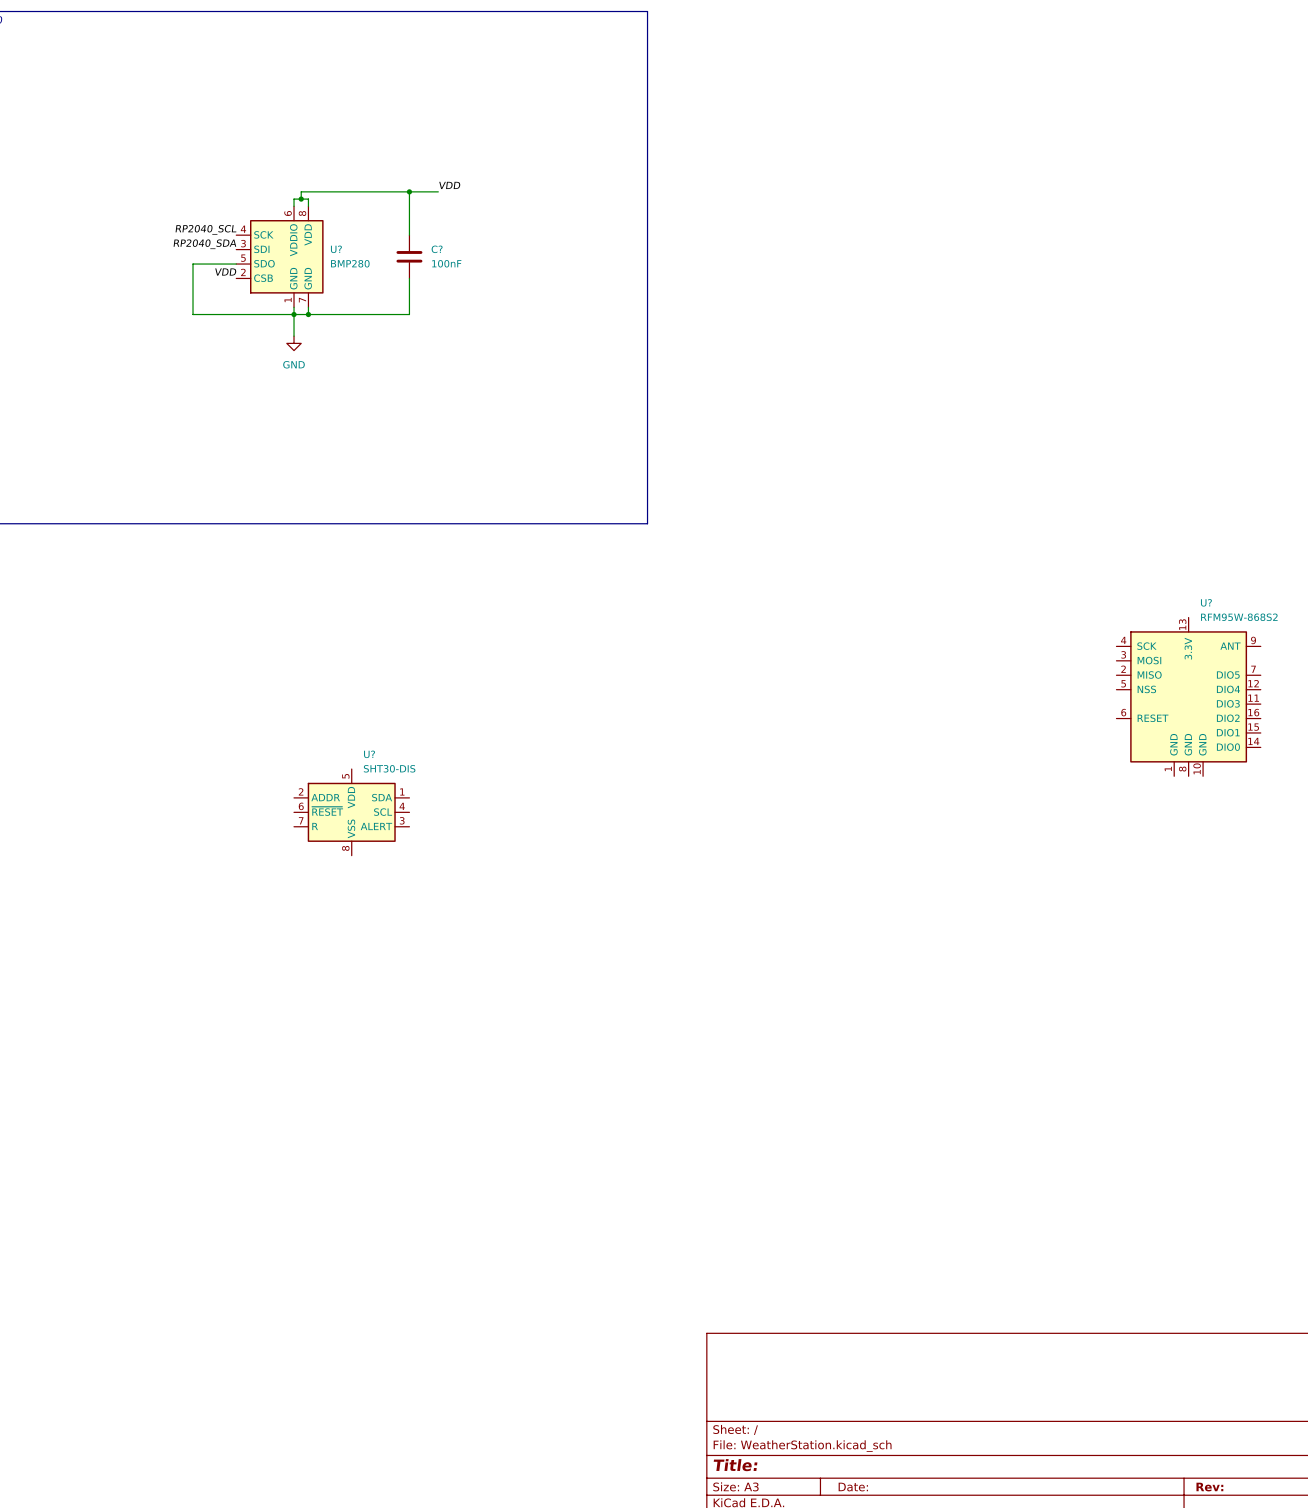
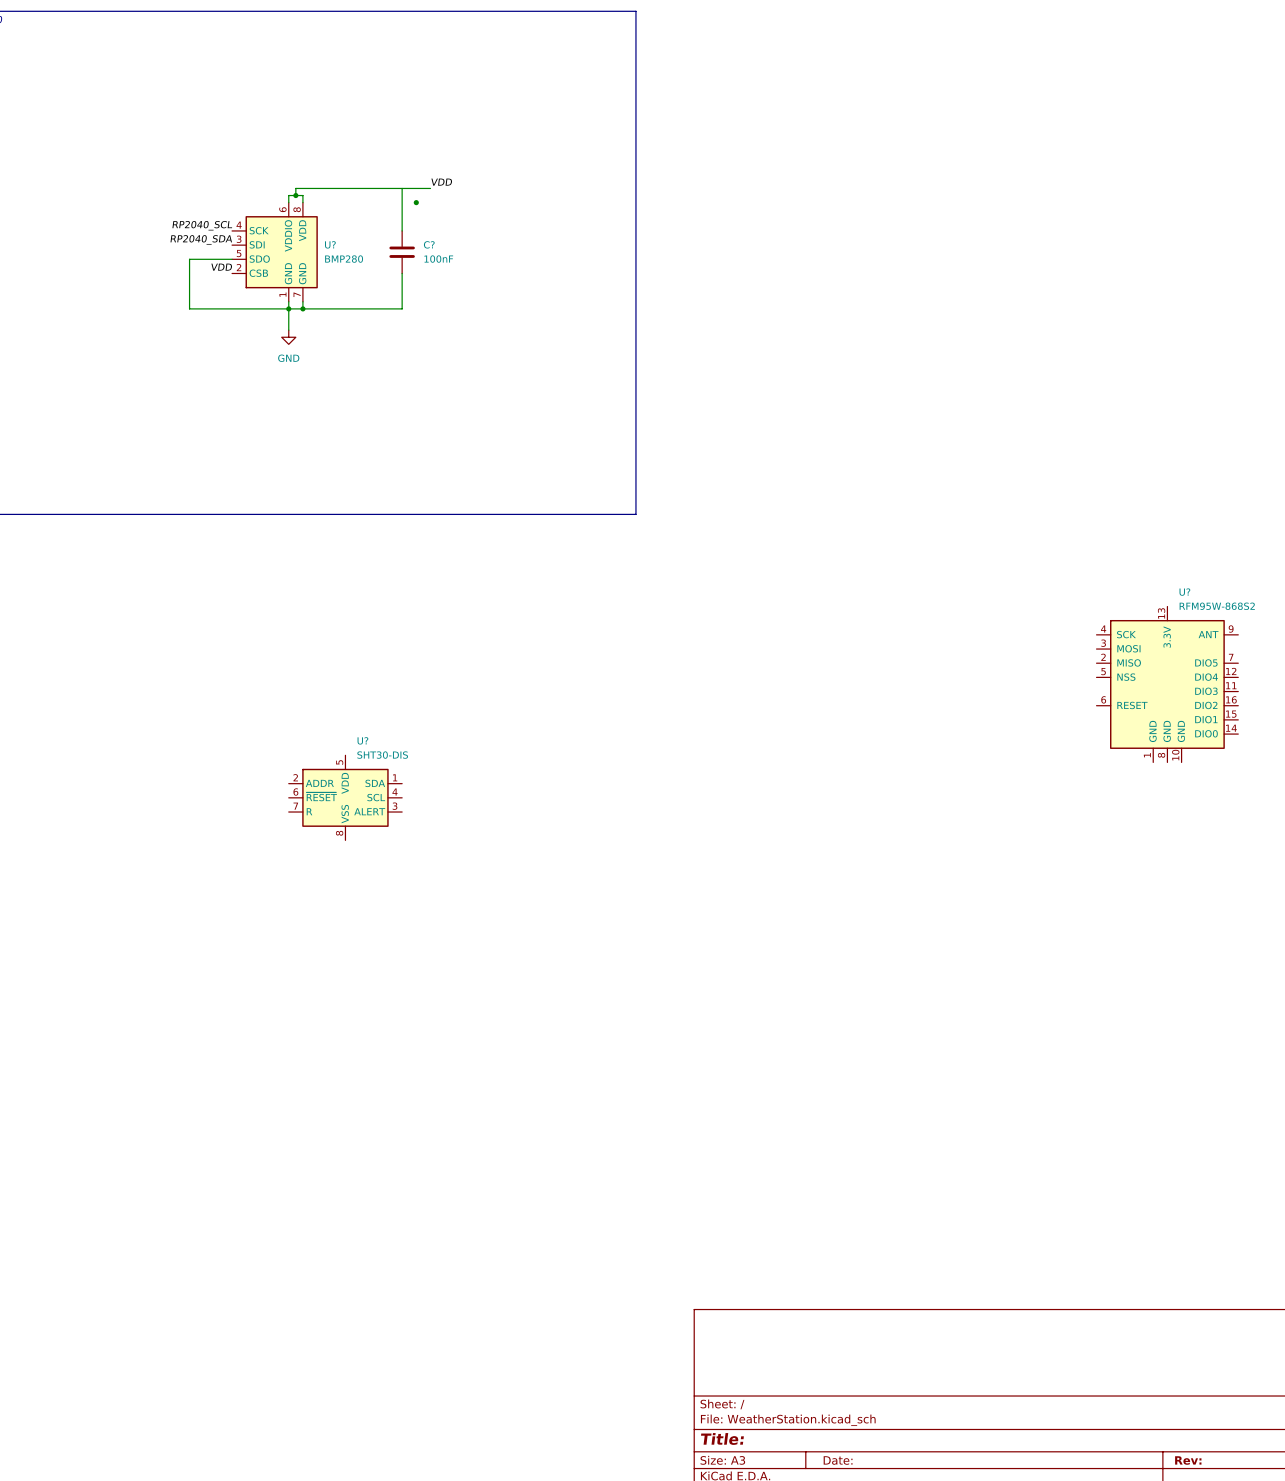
junction position: (409, 191) -> (416, 202)

